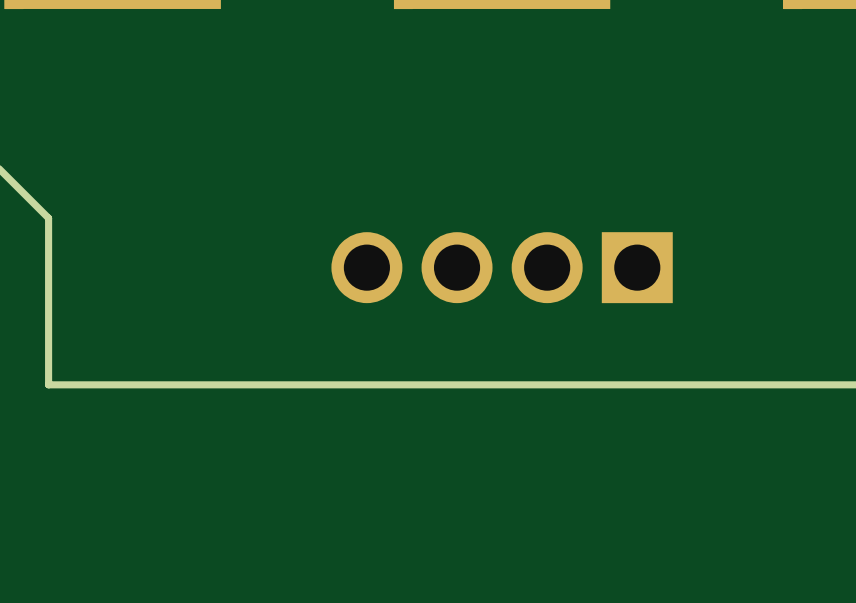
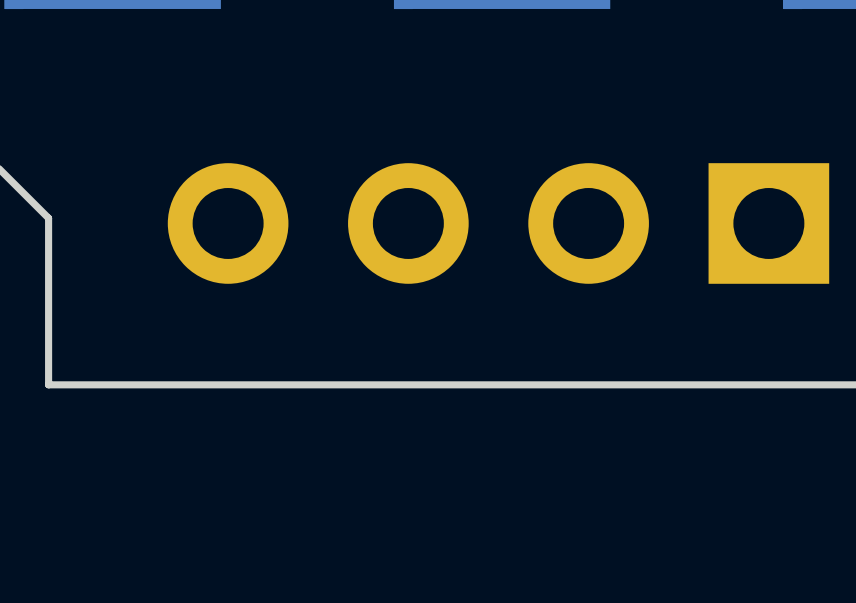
part footprint: [331, 232, 673, 304] -> [167, 163, 830, 284]

